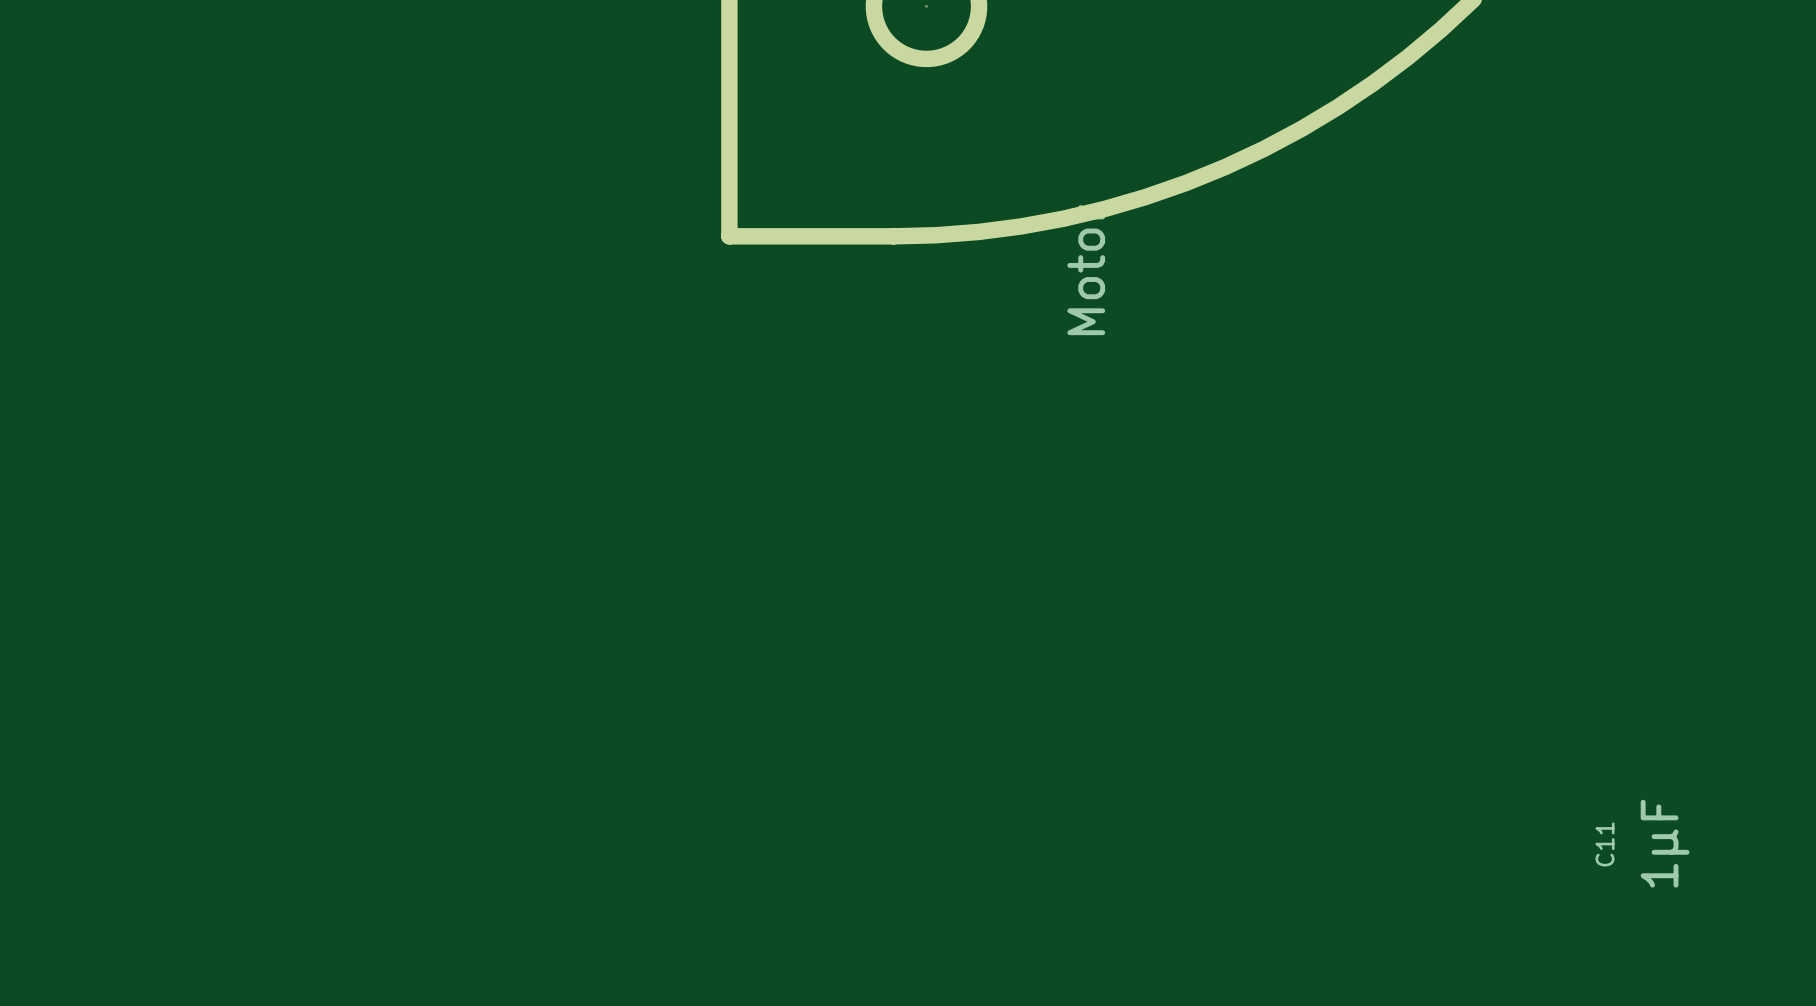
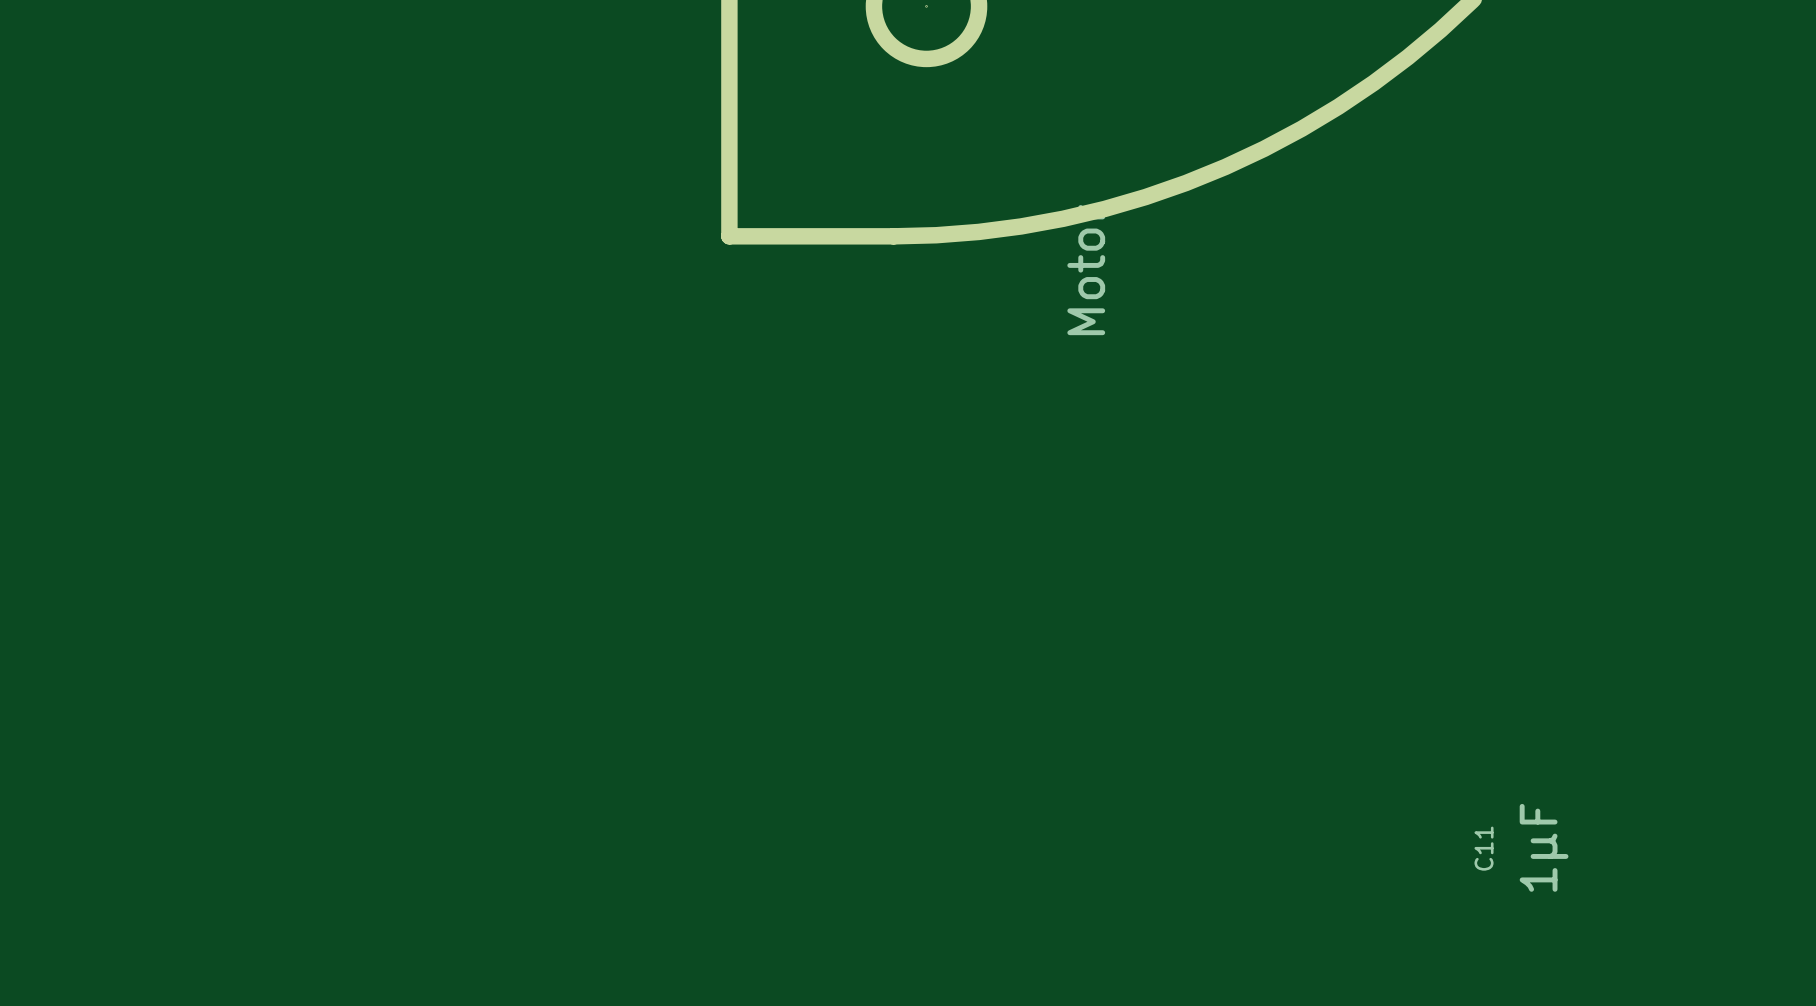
C11 position: (1642, 843) -> (1521, 847)

